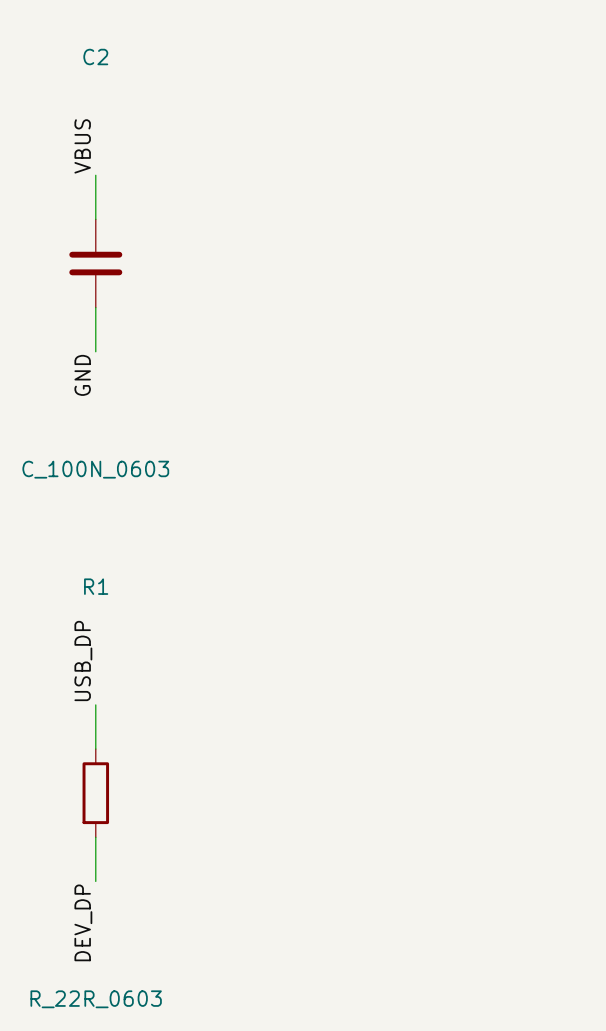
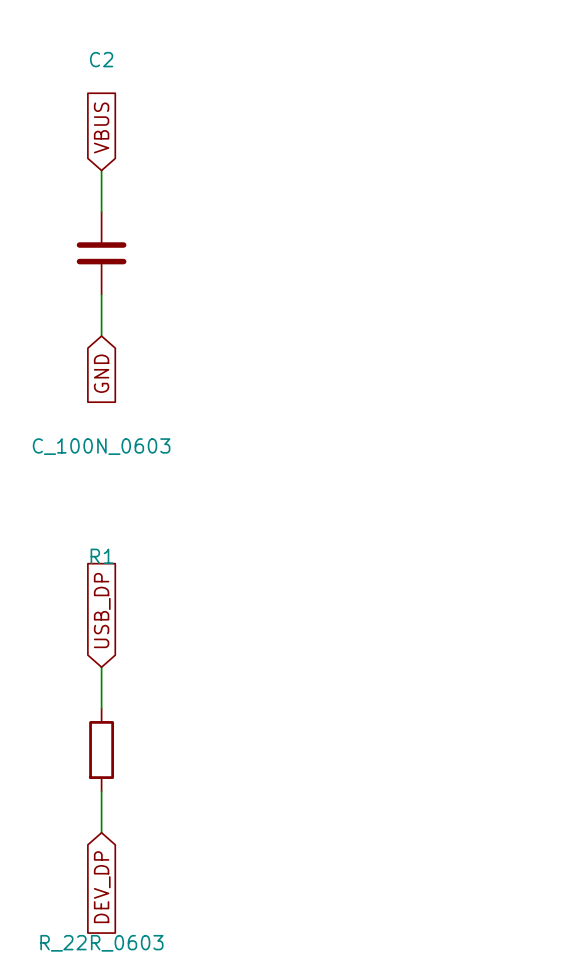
global label: none -> VBUS (101, 127)
label: VBUS (82, 146) -> none
label: GND (82, 375) -> none
global label: none -> GND (101, 373)
global label: none -> USB_DP (102, 610)
label: USB_DP (83, 661) -> none
label: DEV_DP (83, 922) -> none
global label: none -> DEV_DP (102, 887)

